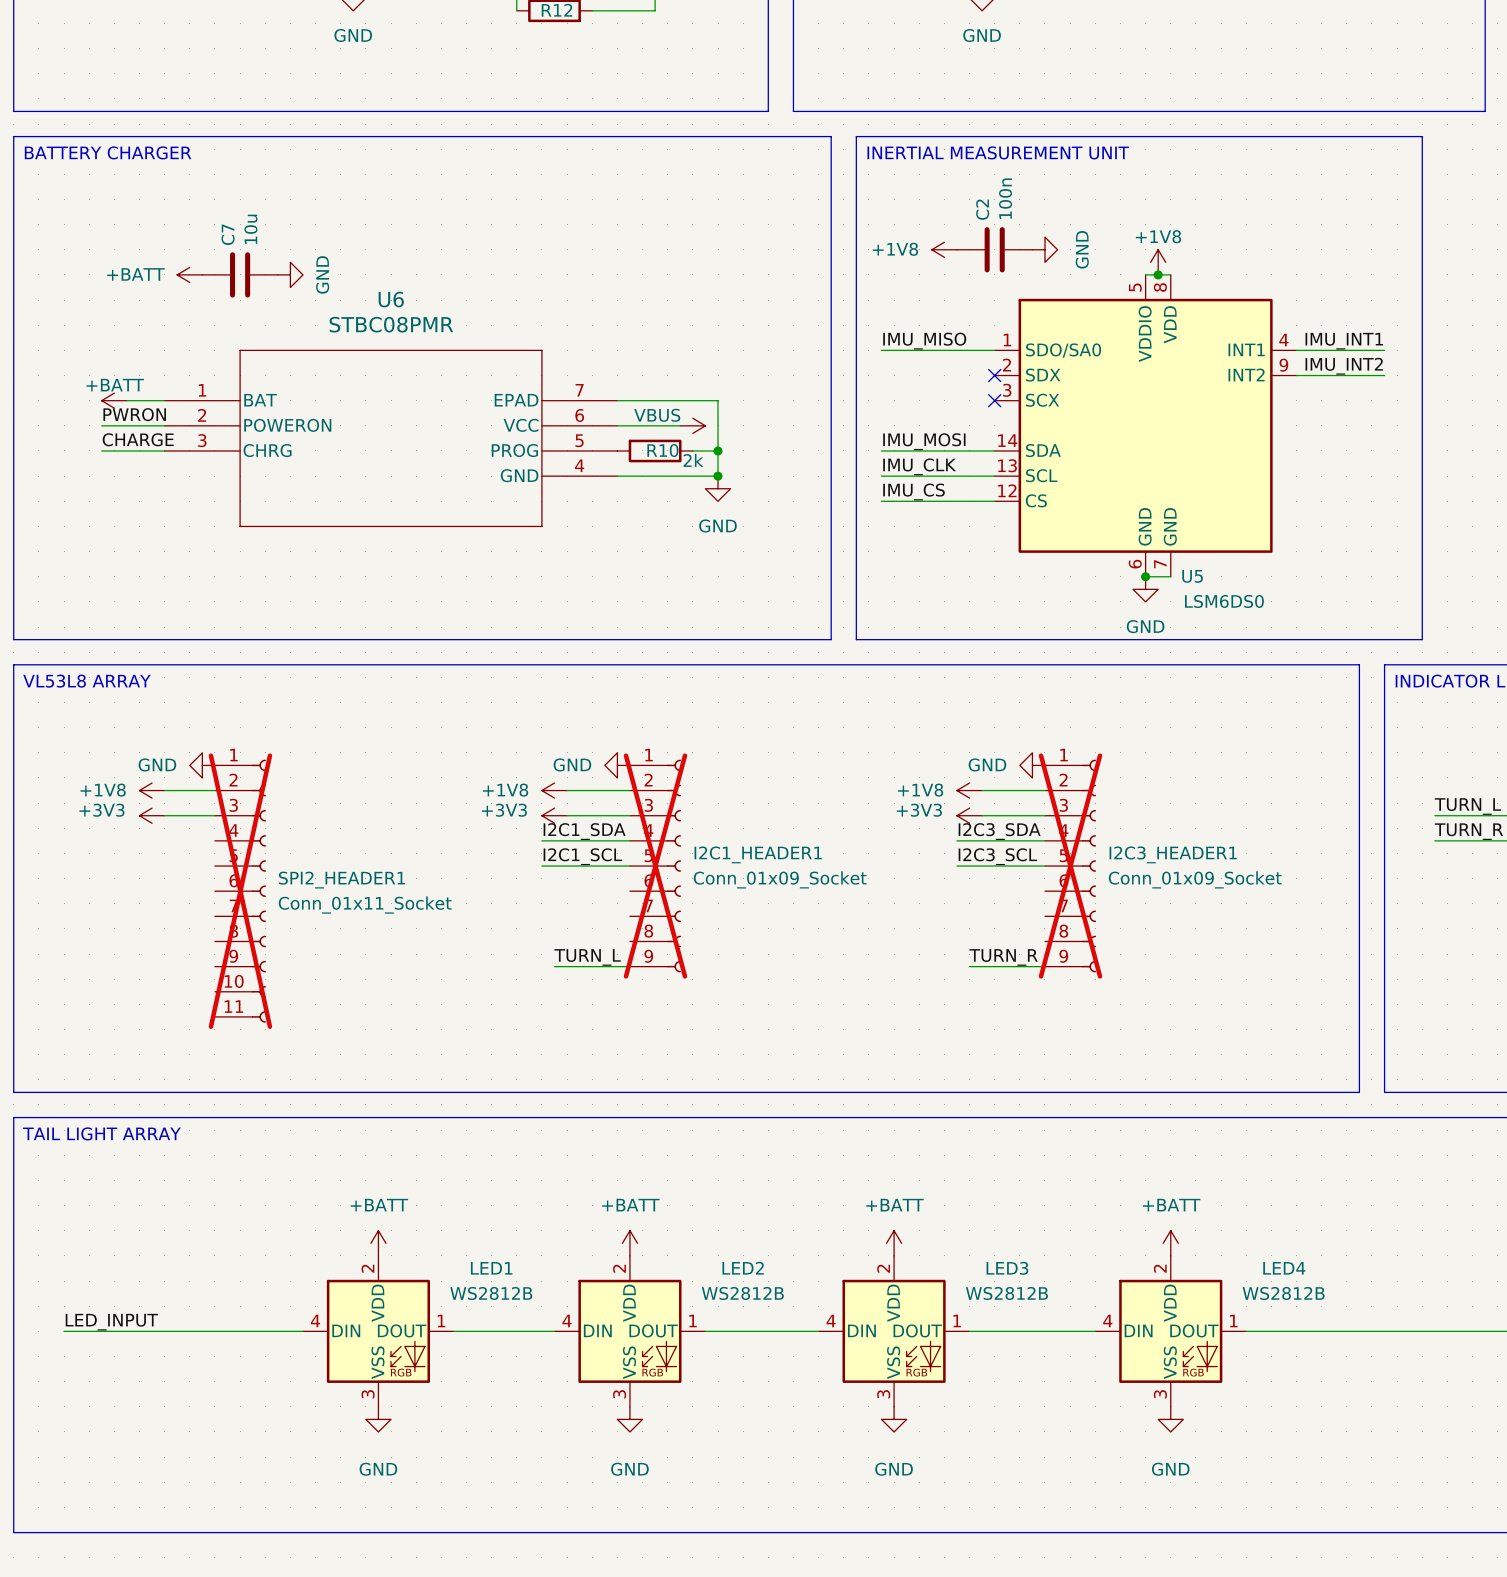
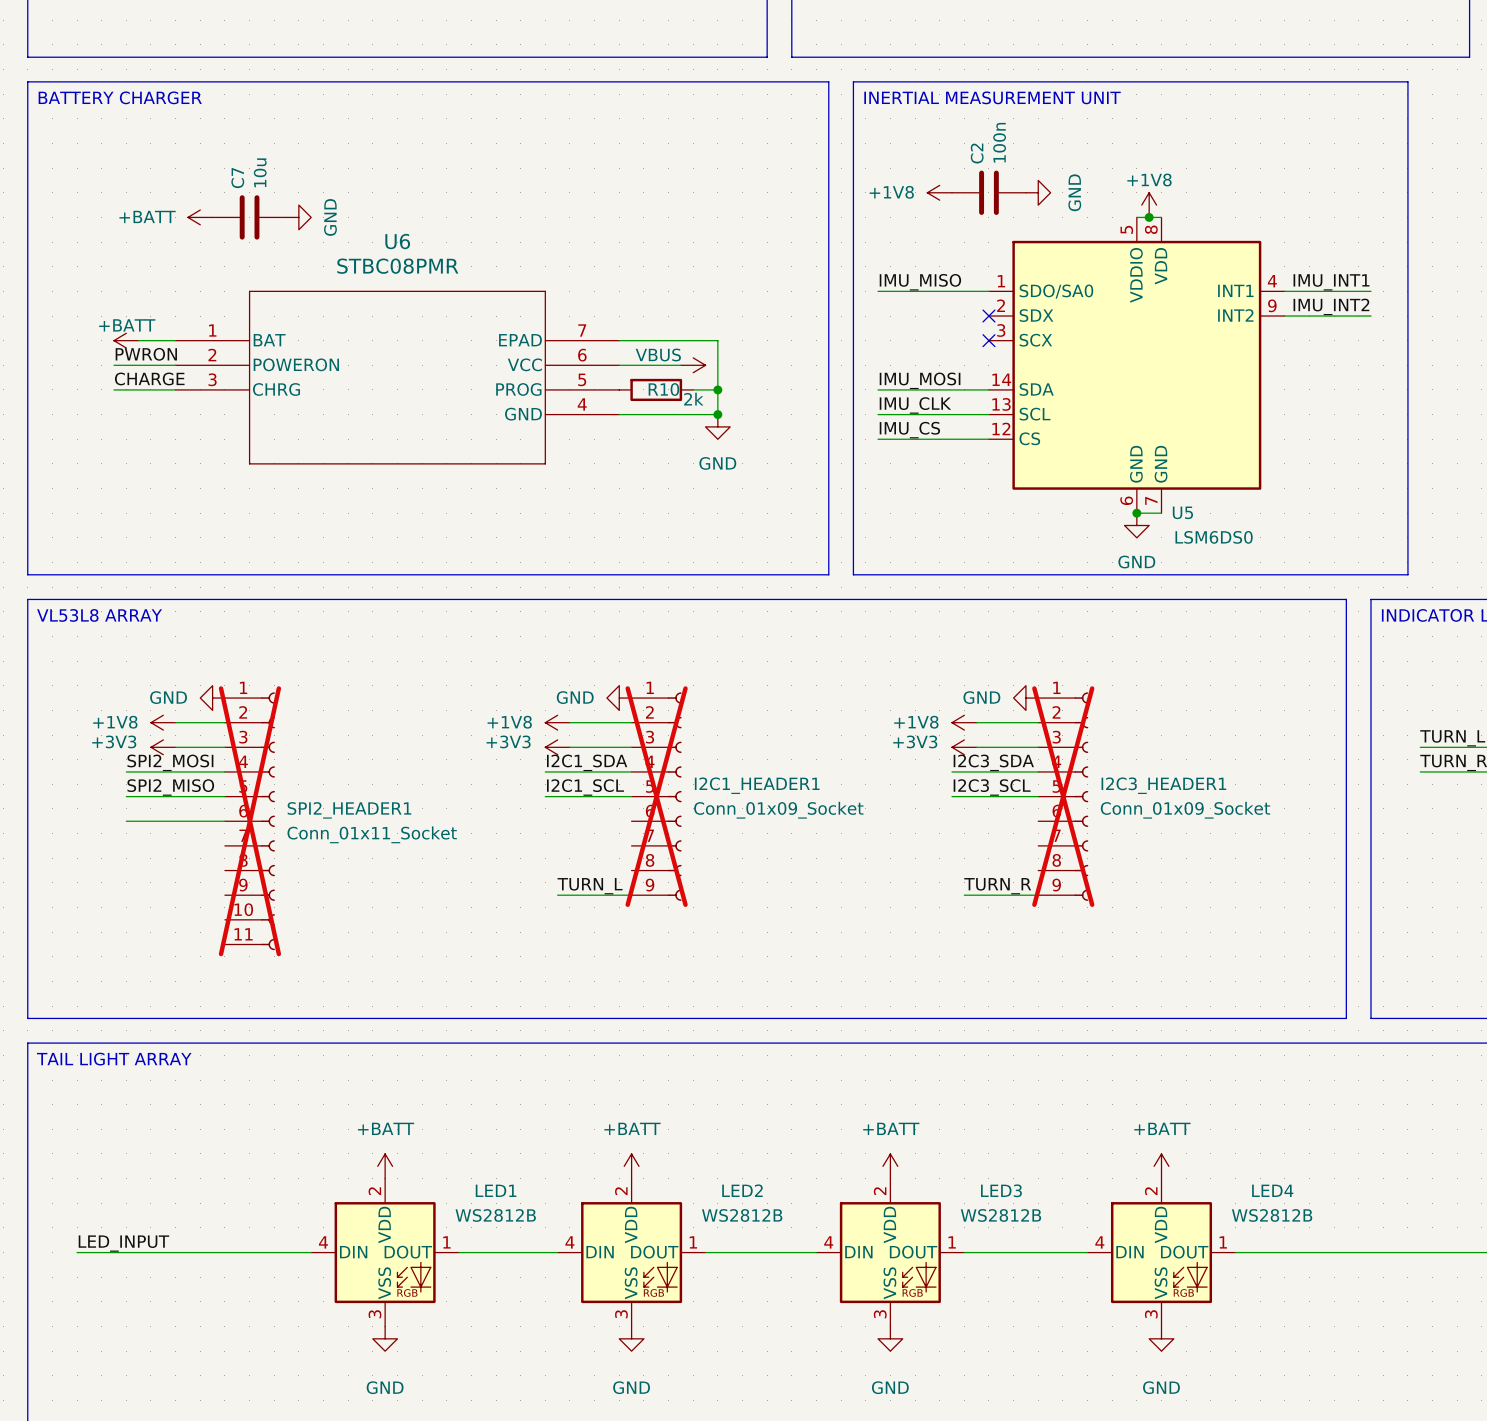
label: none -> SPI2_MOSI (170, 762)
wire: none -> (126, 771) (224, 771)
label: none -> SPI2_MISO (170, 787)
wire: none -> (126, 796) (224, 796)
wire: none -> (126, 821) (224, 821)

